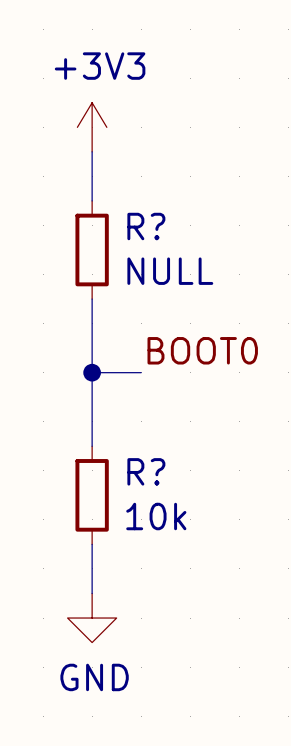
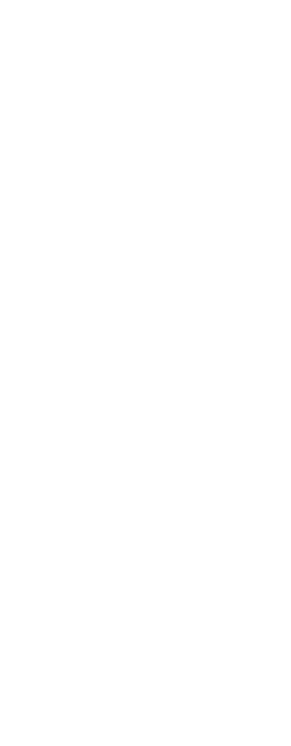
power symbol: +3V3 (92, 127) -> none
wire: (92, 151) (92, 200) -> none
R?: NULL (92, 250) -> none
wire: (92, 299) (92, 446) -> none
label: BOOT0 (202, 350) -> none
wire: (92, 372) (141, 372) -> none
junction: (92, 372) -> none
R?: 10k (92, 495) -> none
wire: (92, 544) (92, 593) -> none
power symbol: GND (92, 618) -> none

